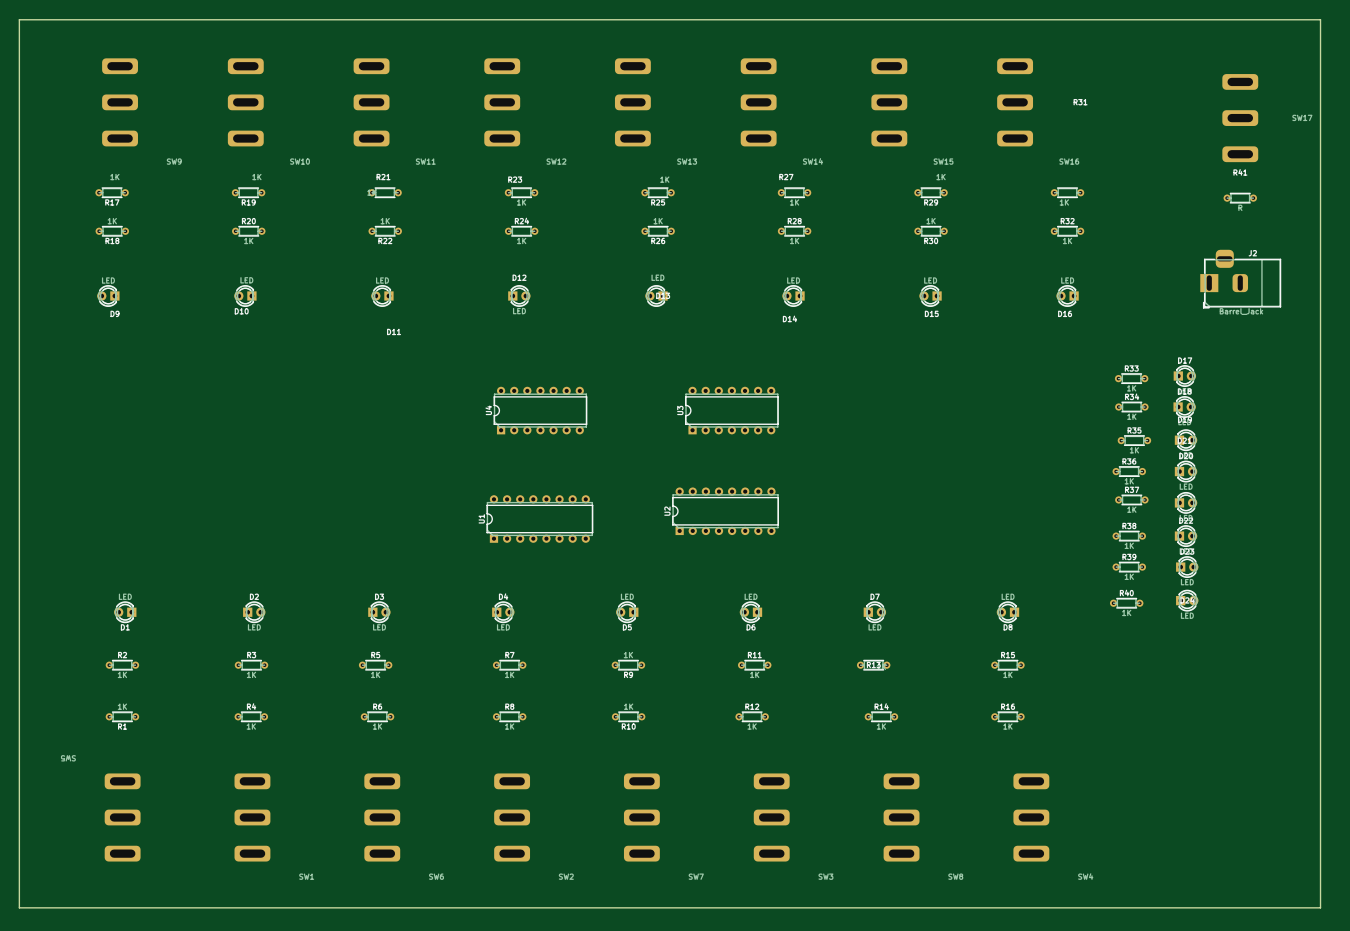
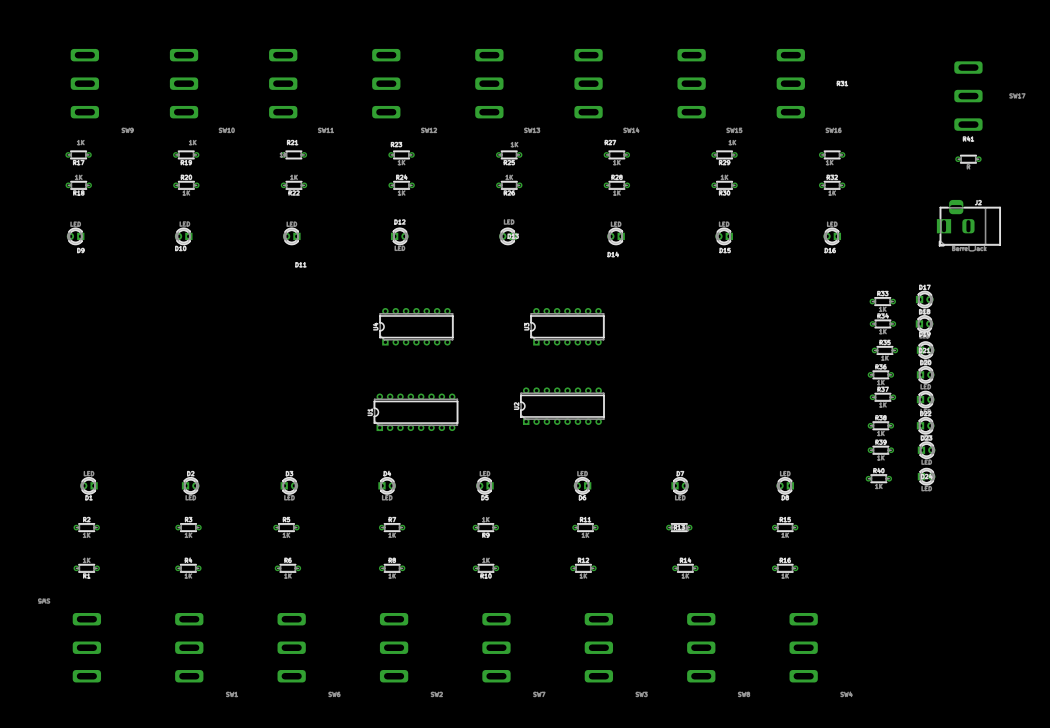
board edge: (19, 19) (1320, 19) (1320, 907) (19, 907) (19, 19) -> none

